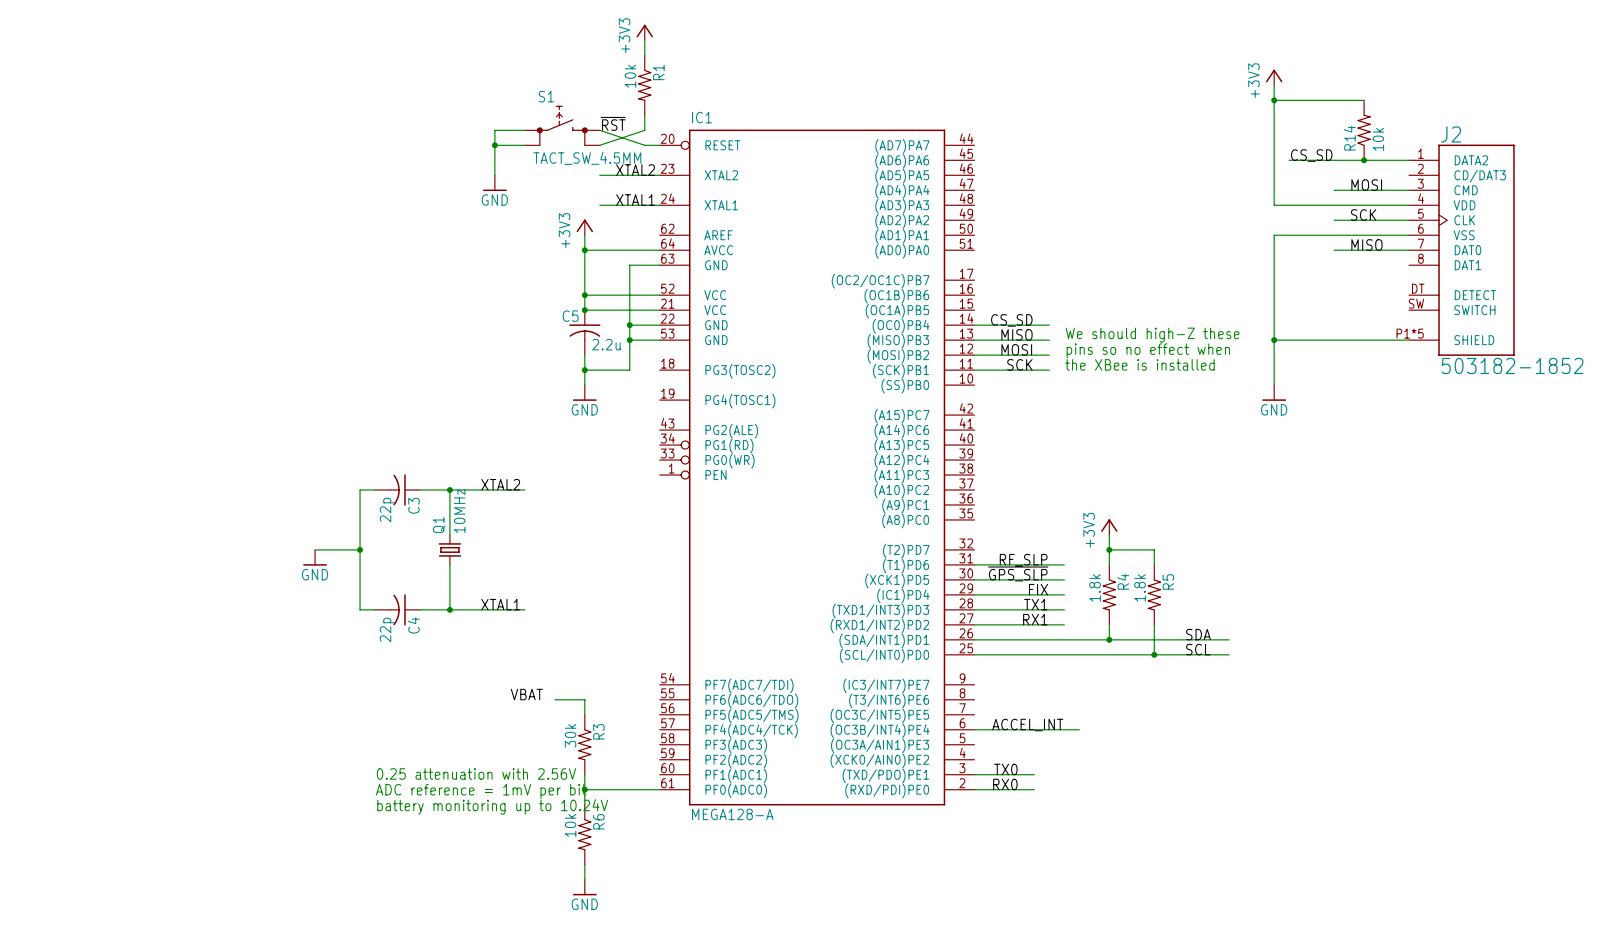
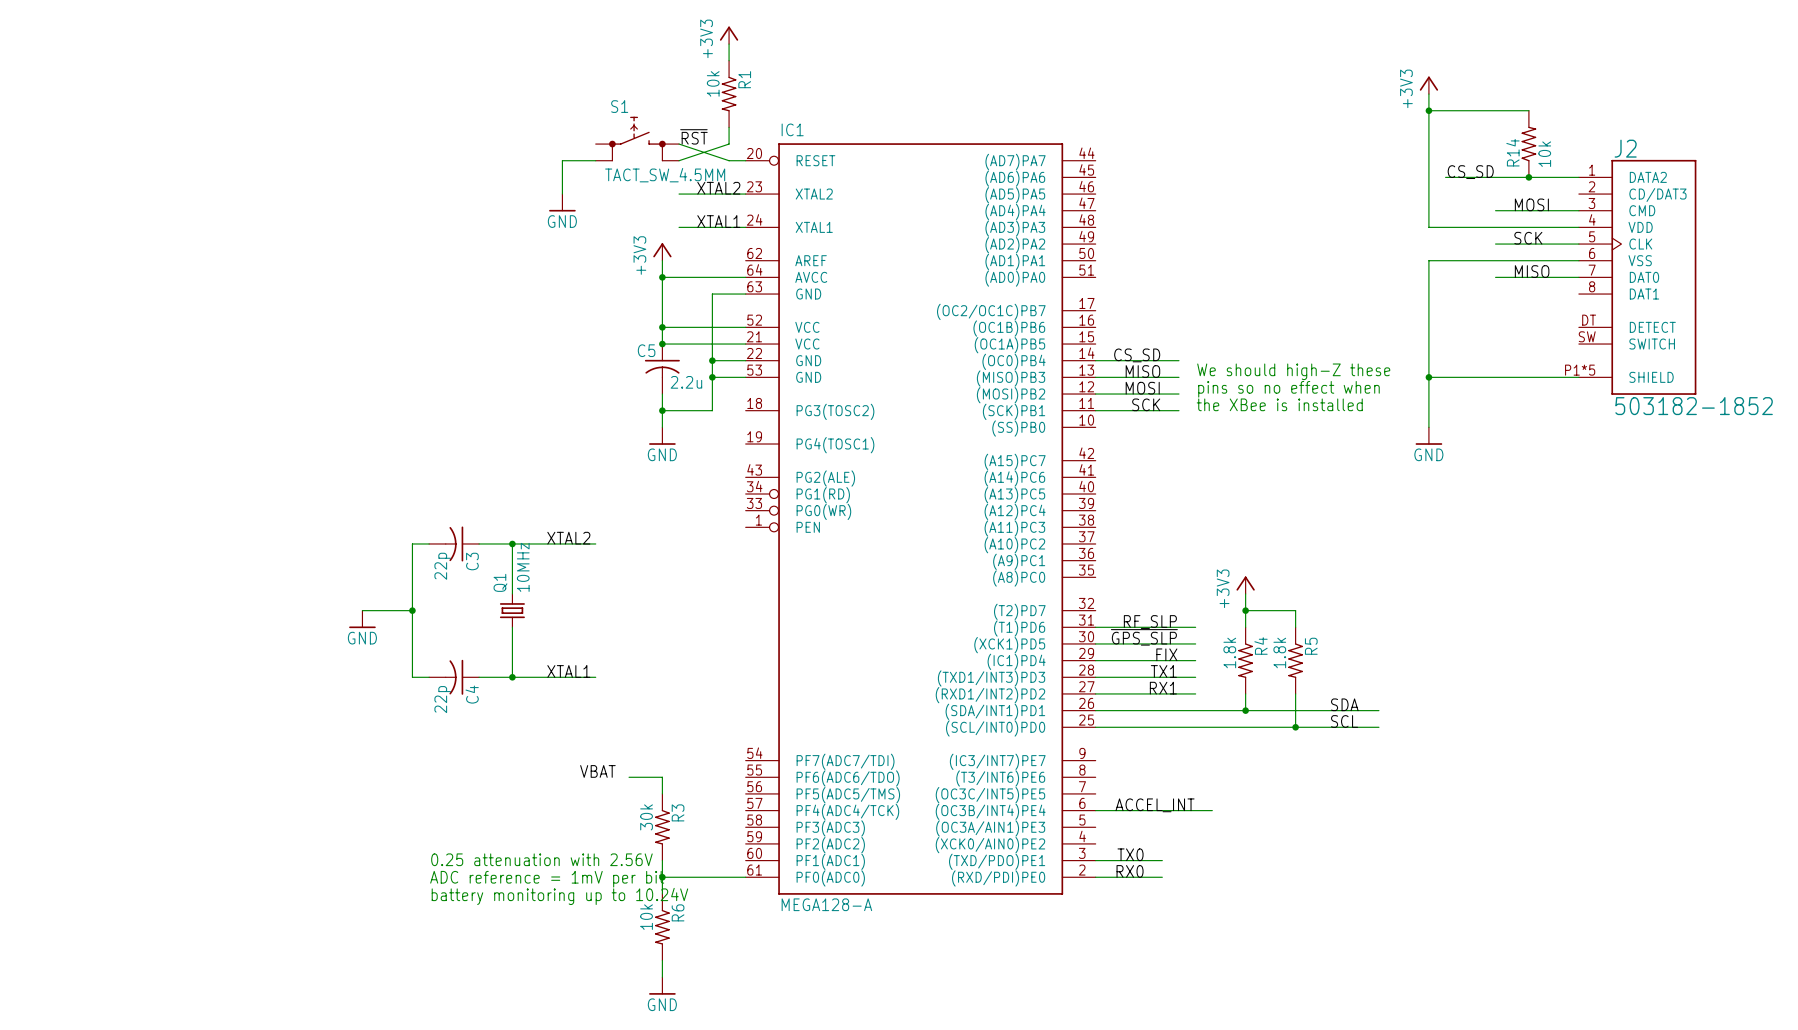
wire: (524, 130) (494, 130) (494, 145) -> none
junction: (494, 145) -> none

